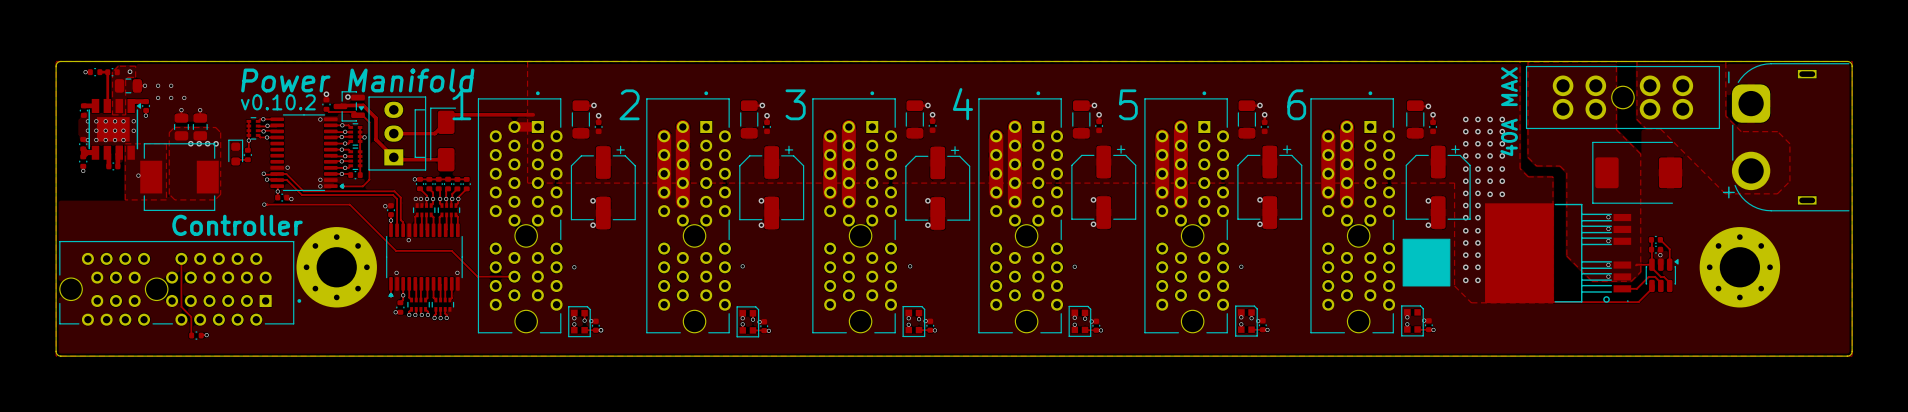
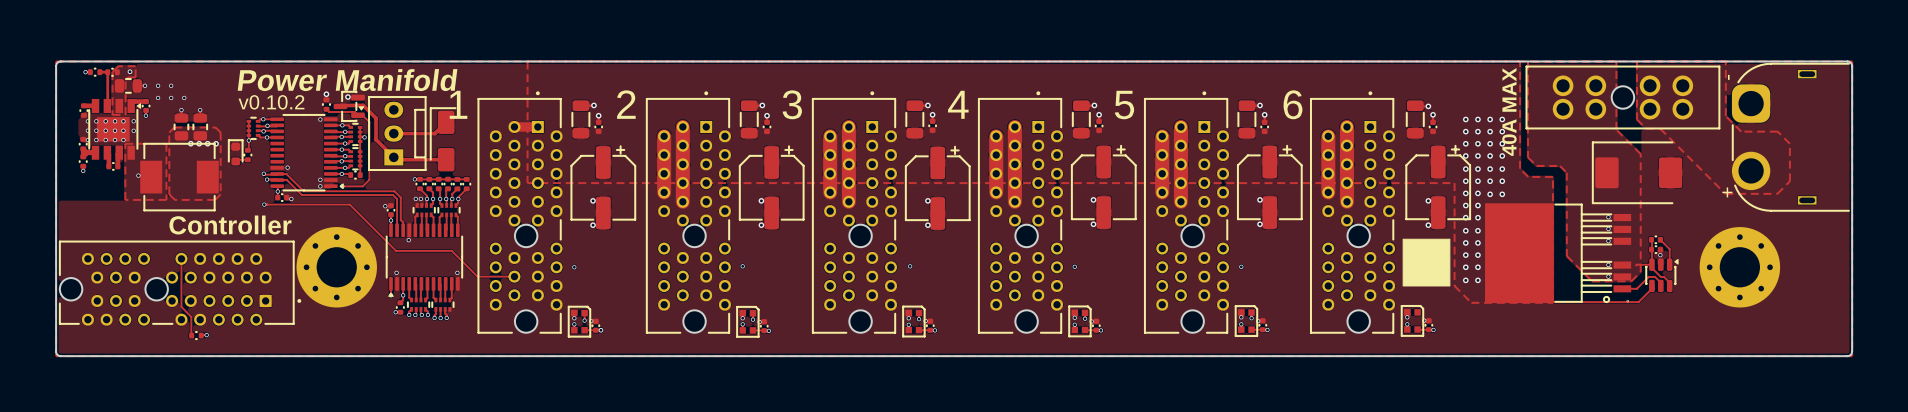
track: (533, 114) (453, 114) (446, 122) -> none

